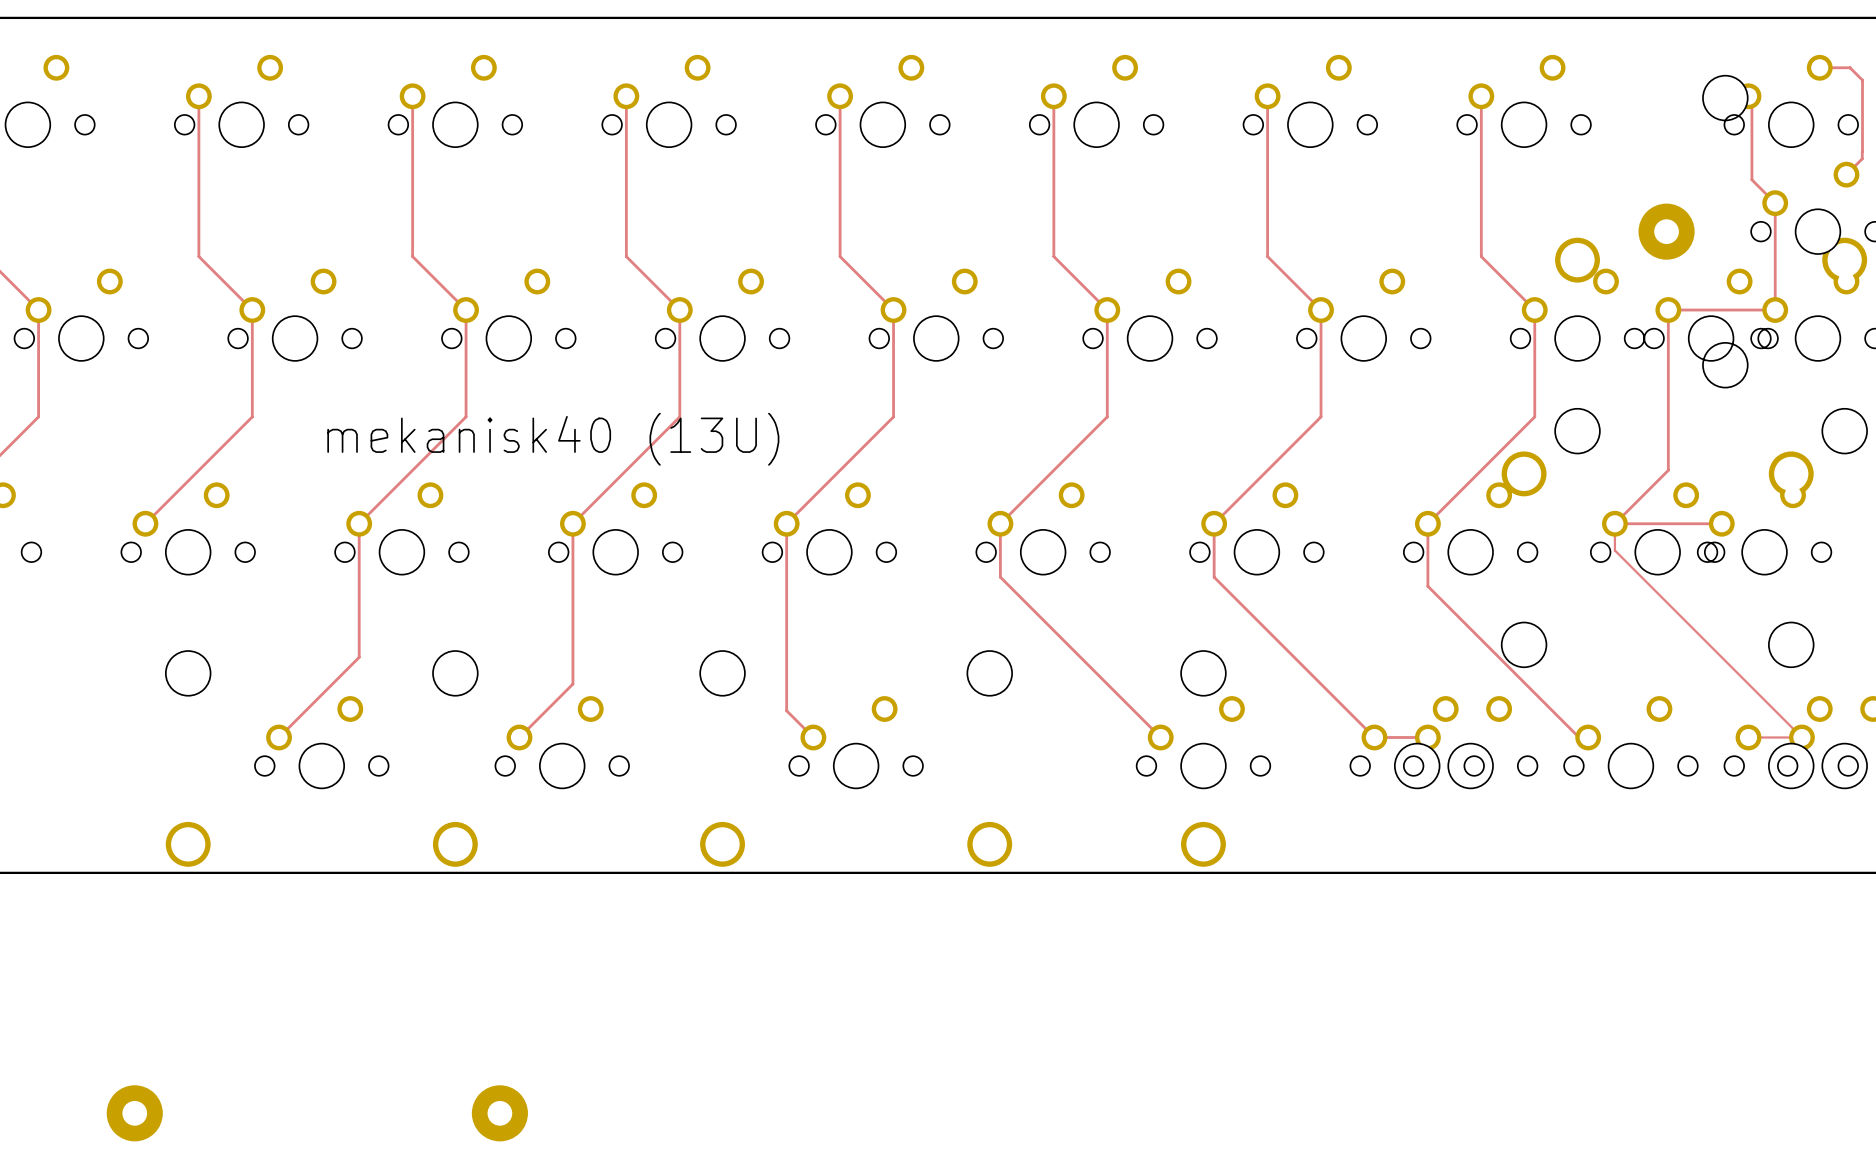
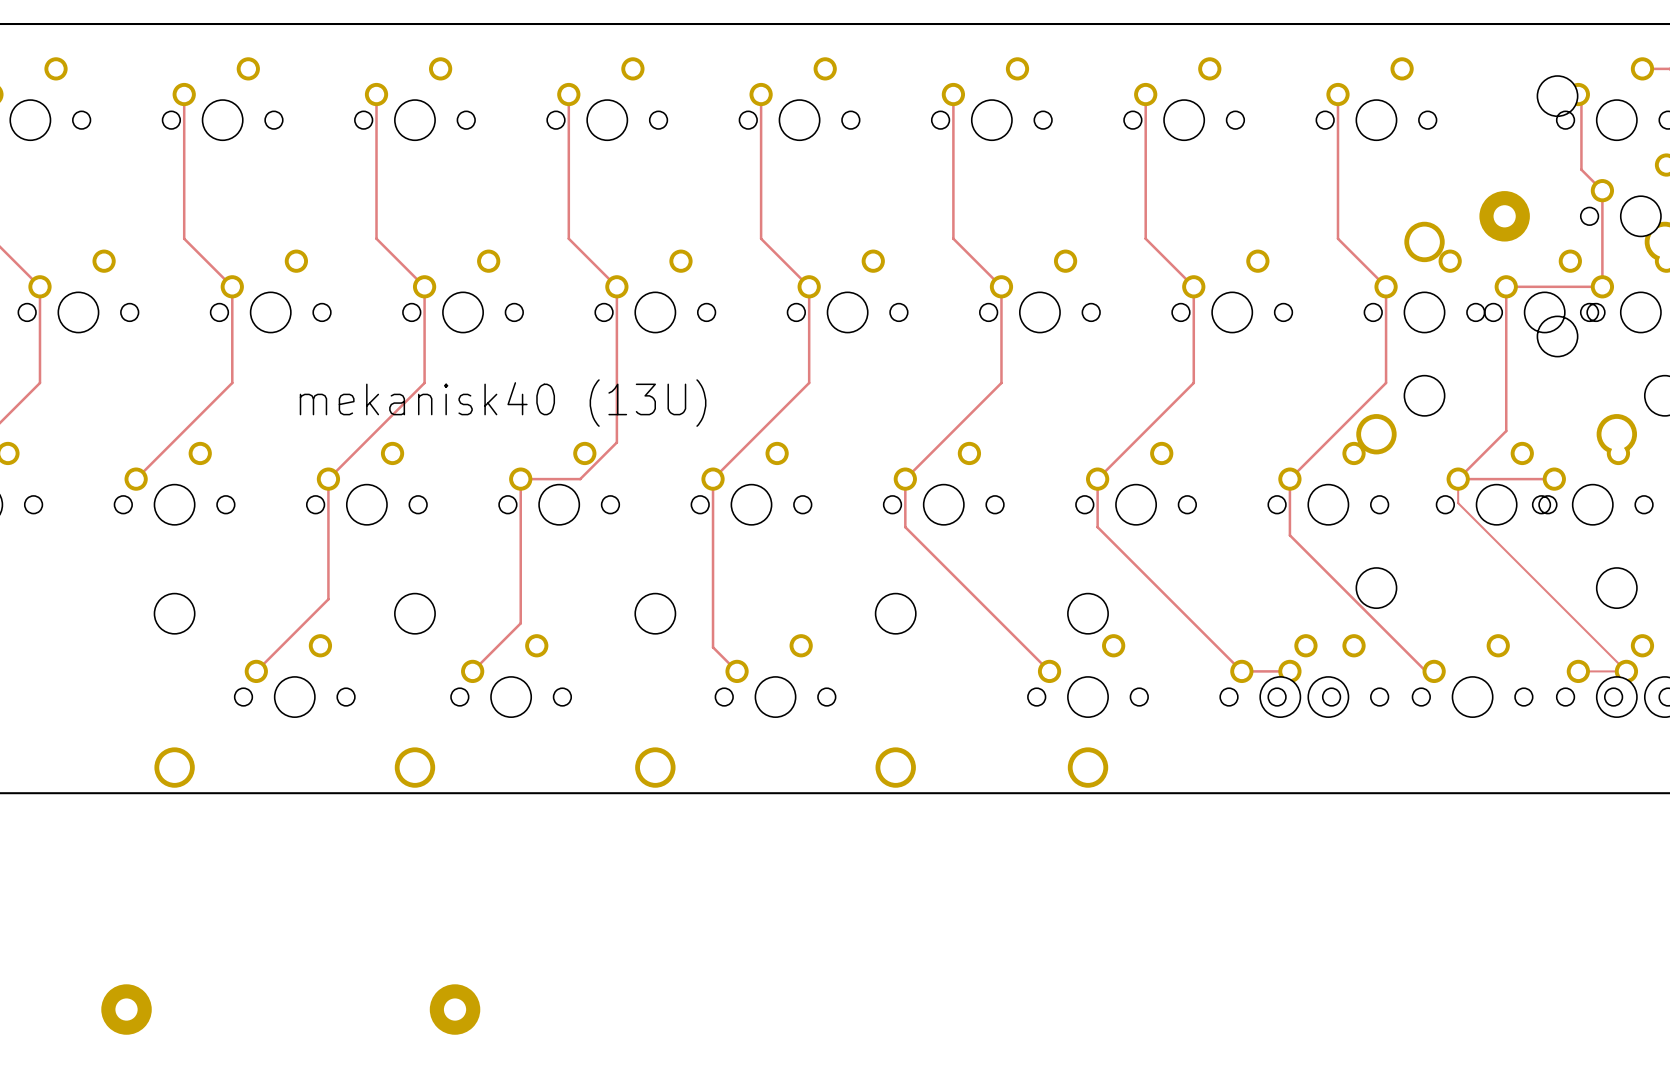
track: (679, 416) (572, 523) -> (616, 382) (616, 442) (580, 479) (520, 479)

